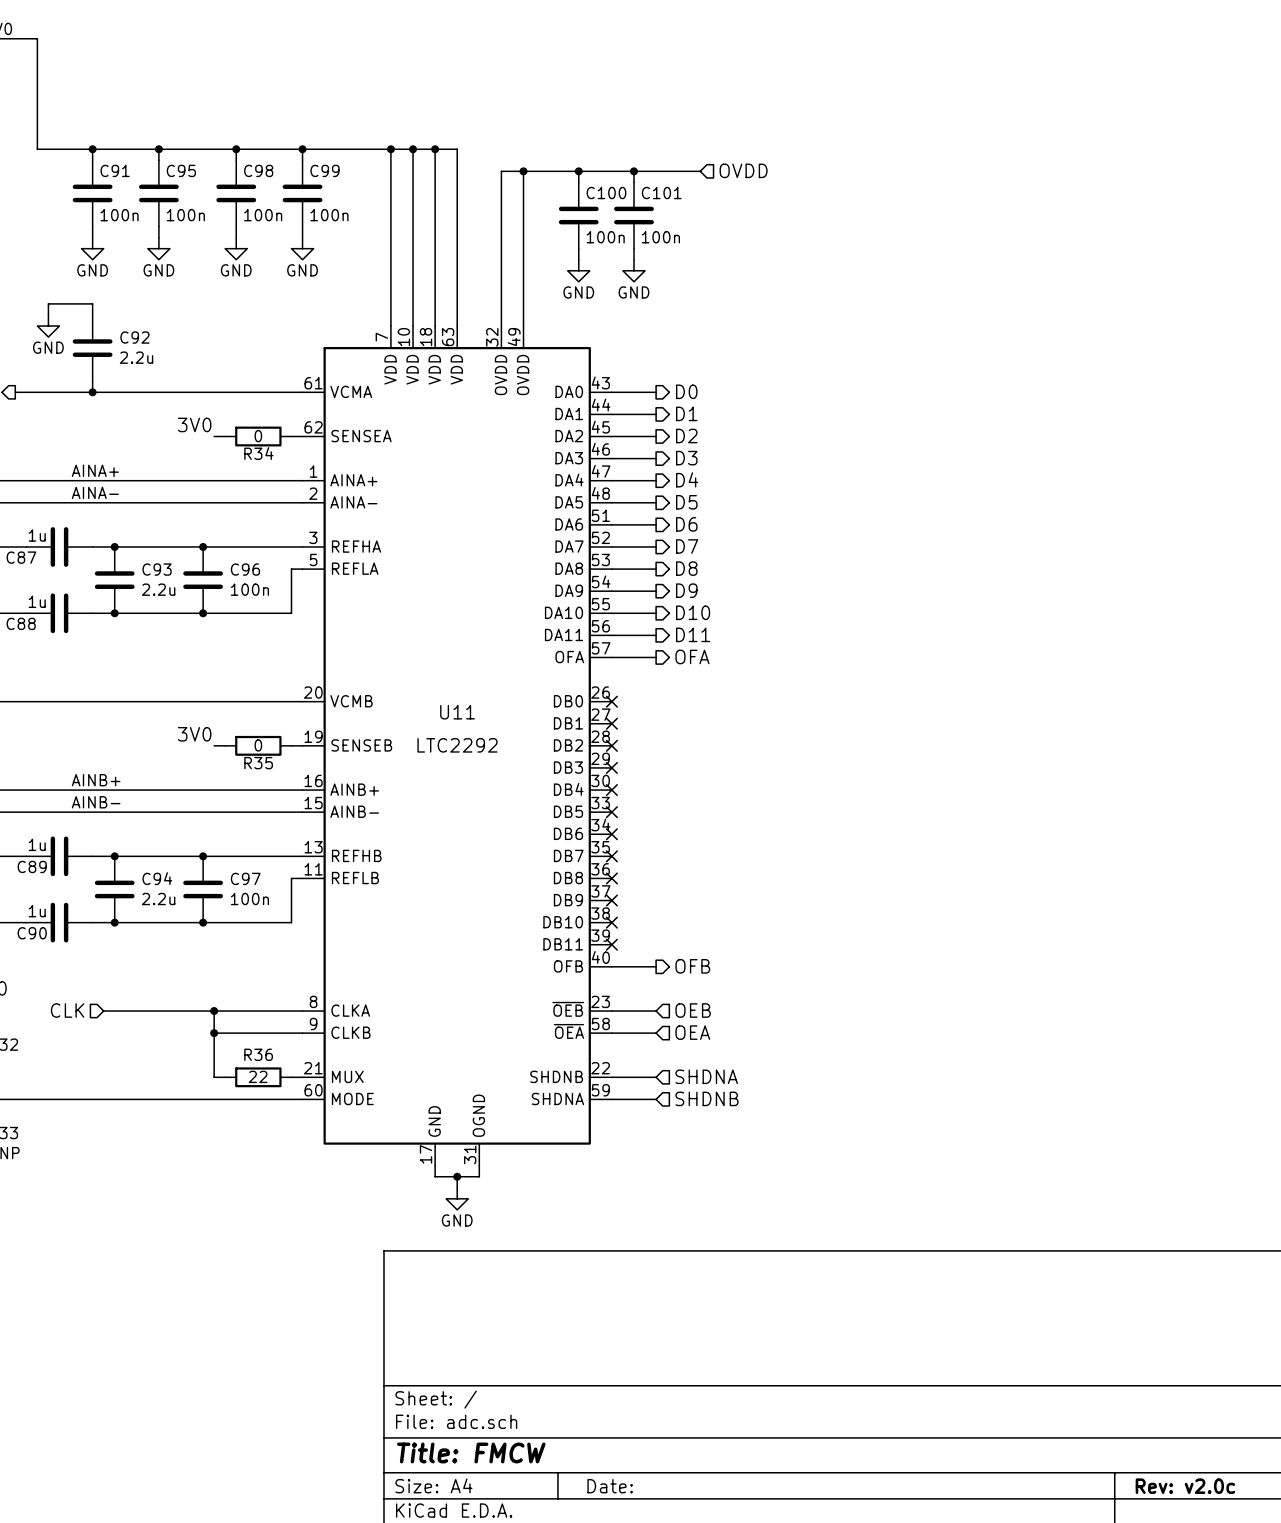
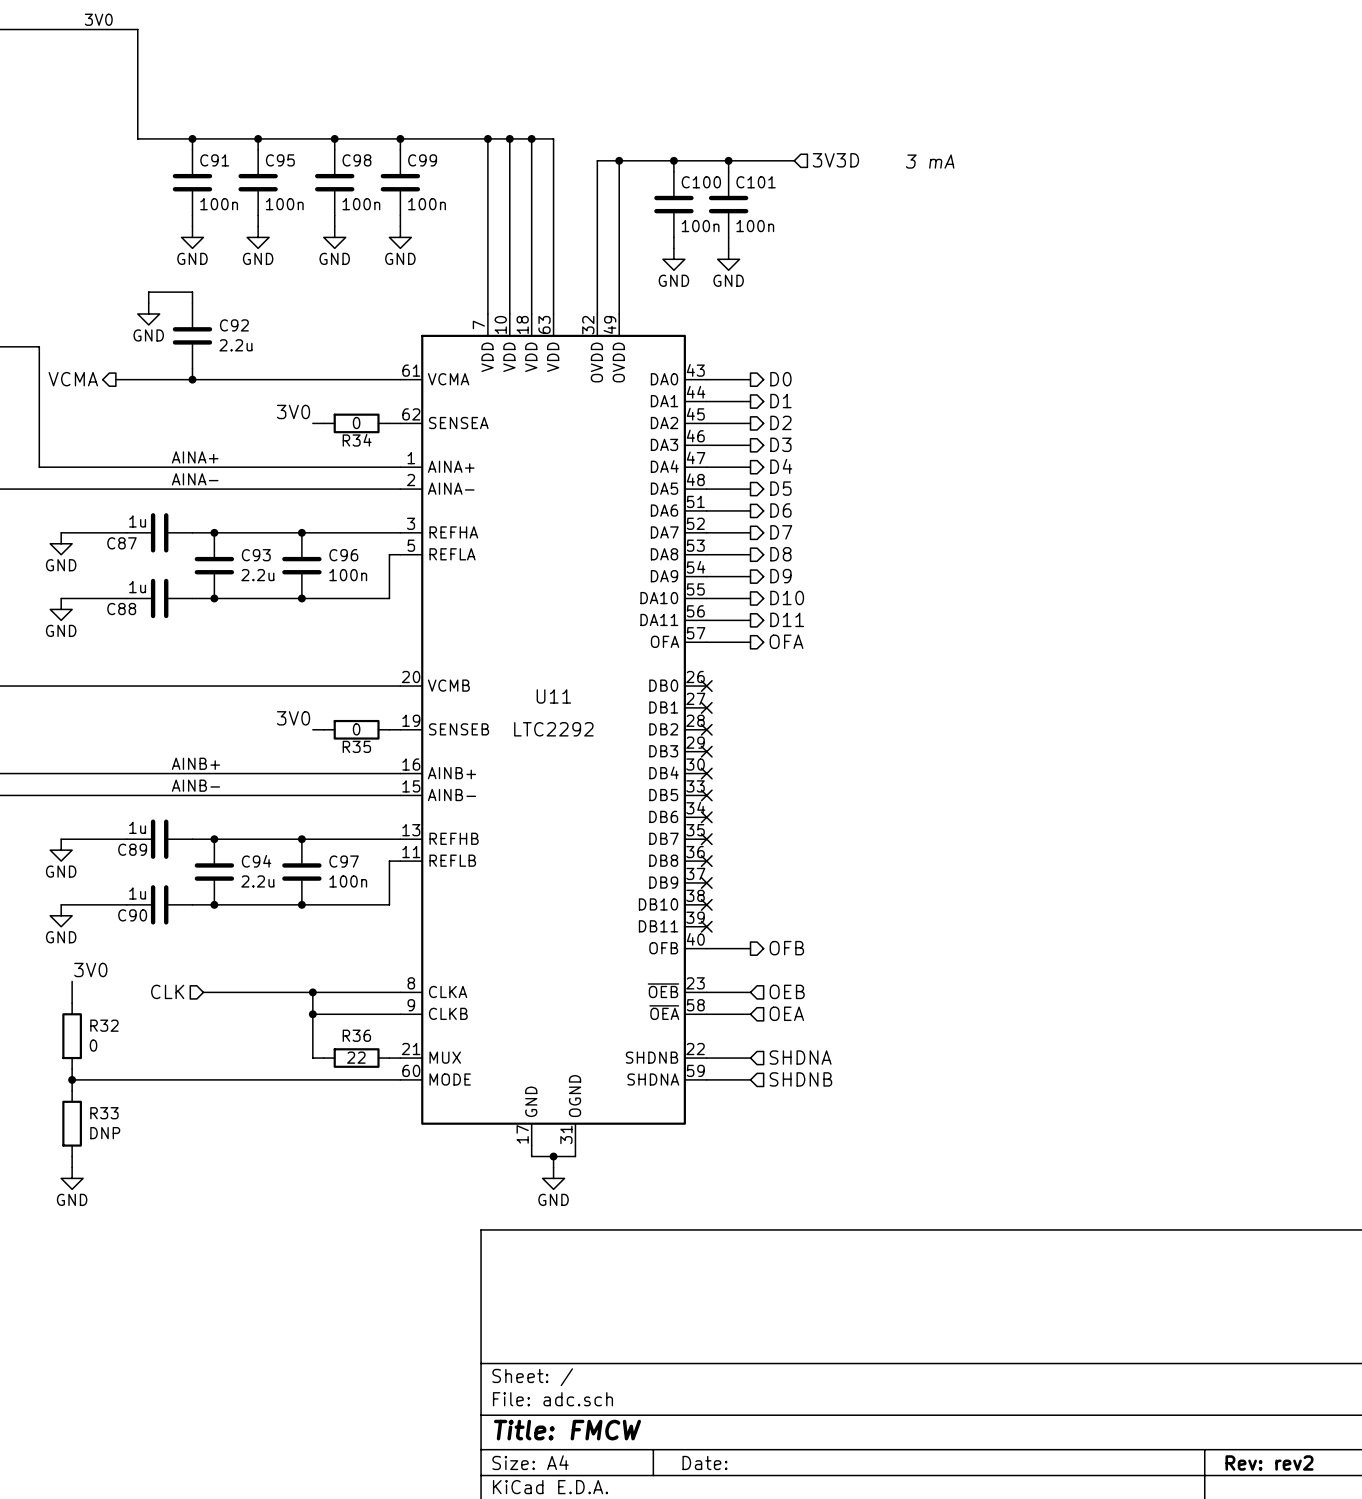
hierarchical label: OVDD (743, 170) -> 3V3D (835, 160)
text: none -> 3 mA (930, 161)
title block: Rev: v2.0c (1185, 1486) -> Rev: rev2 (1269, 1462)

